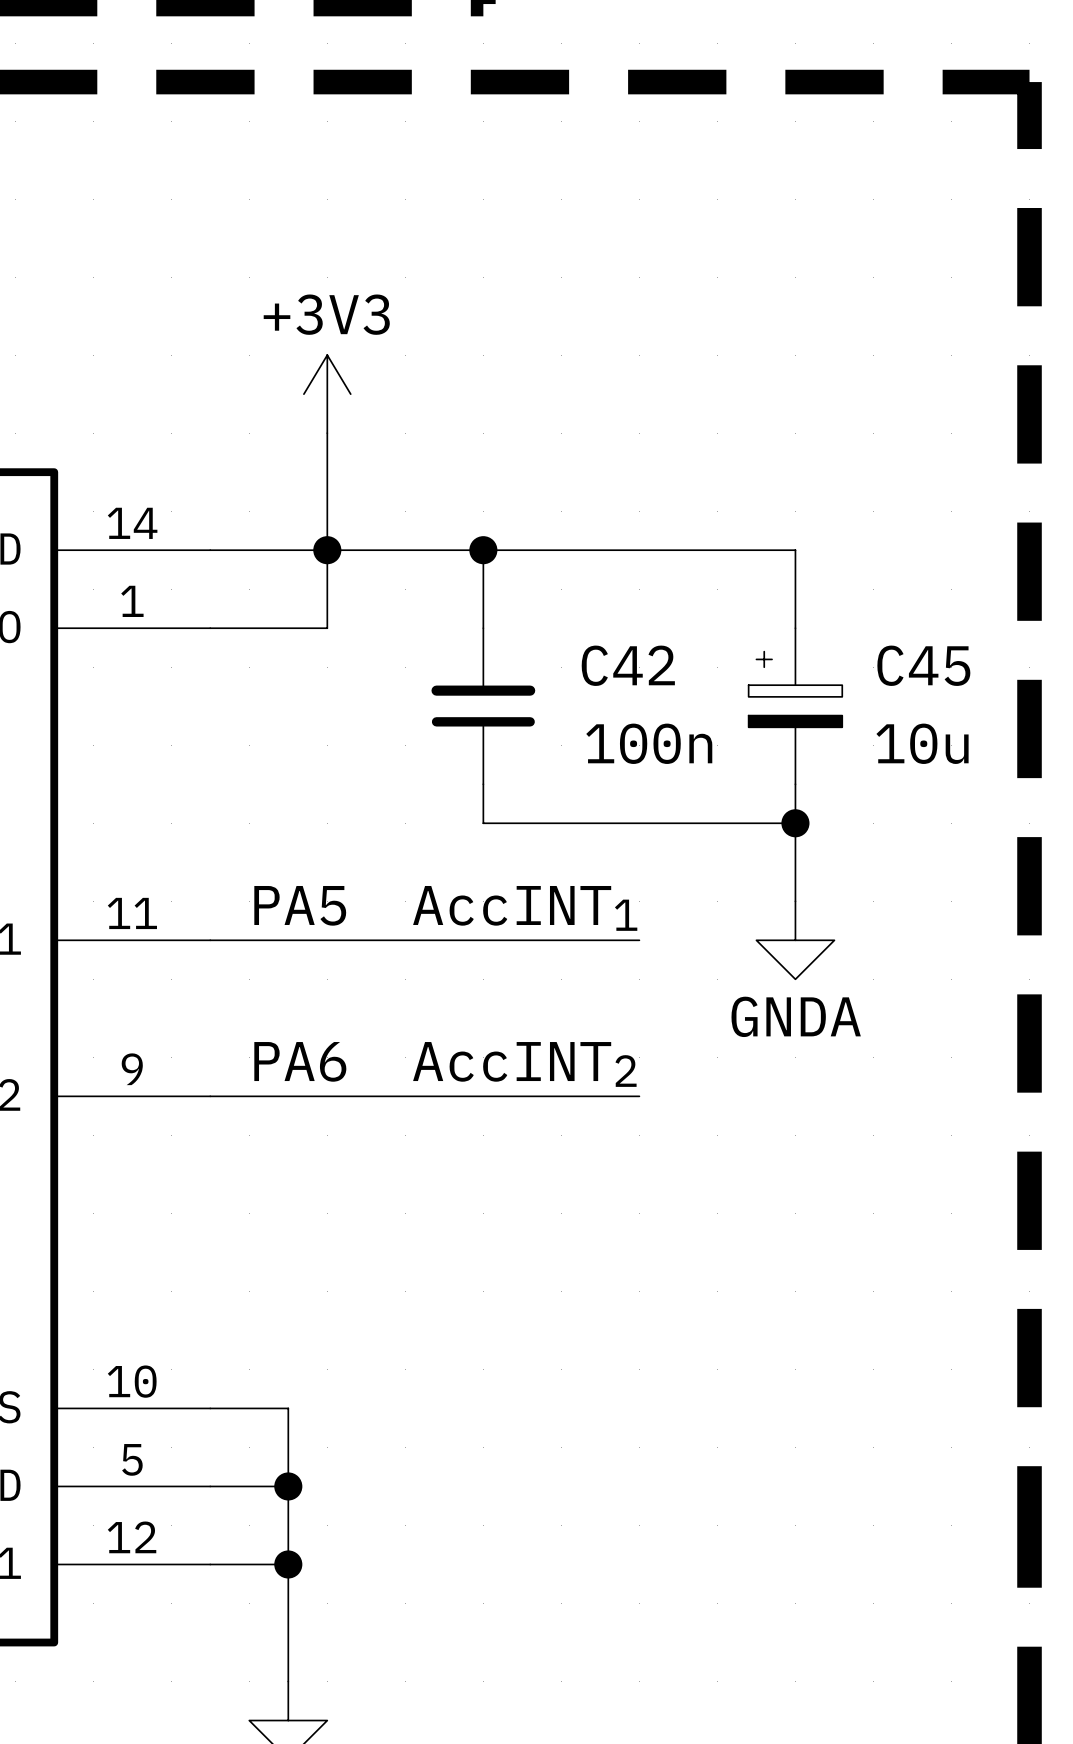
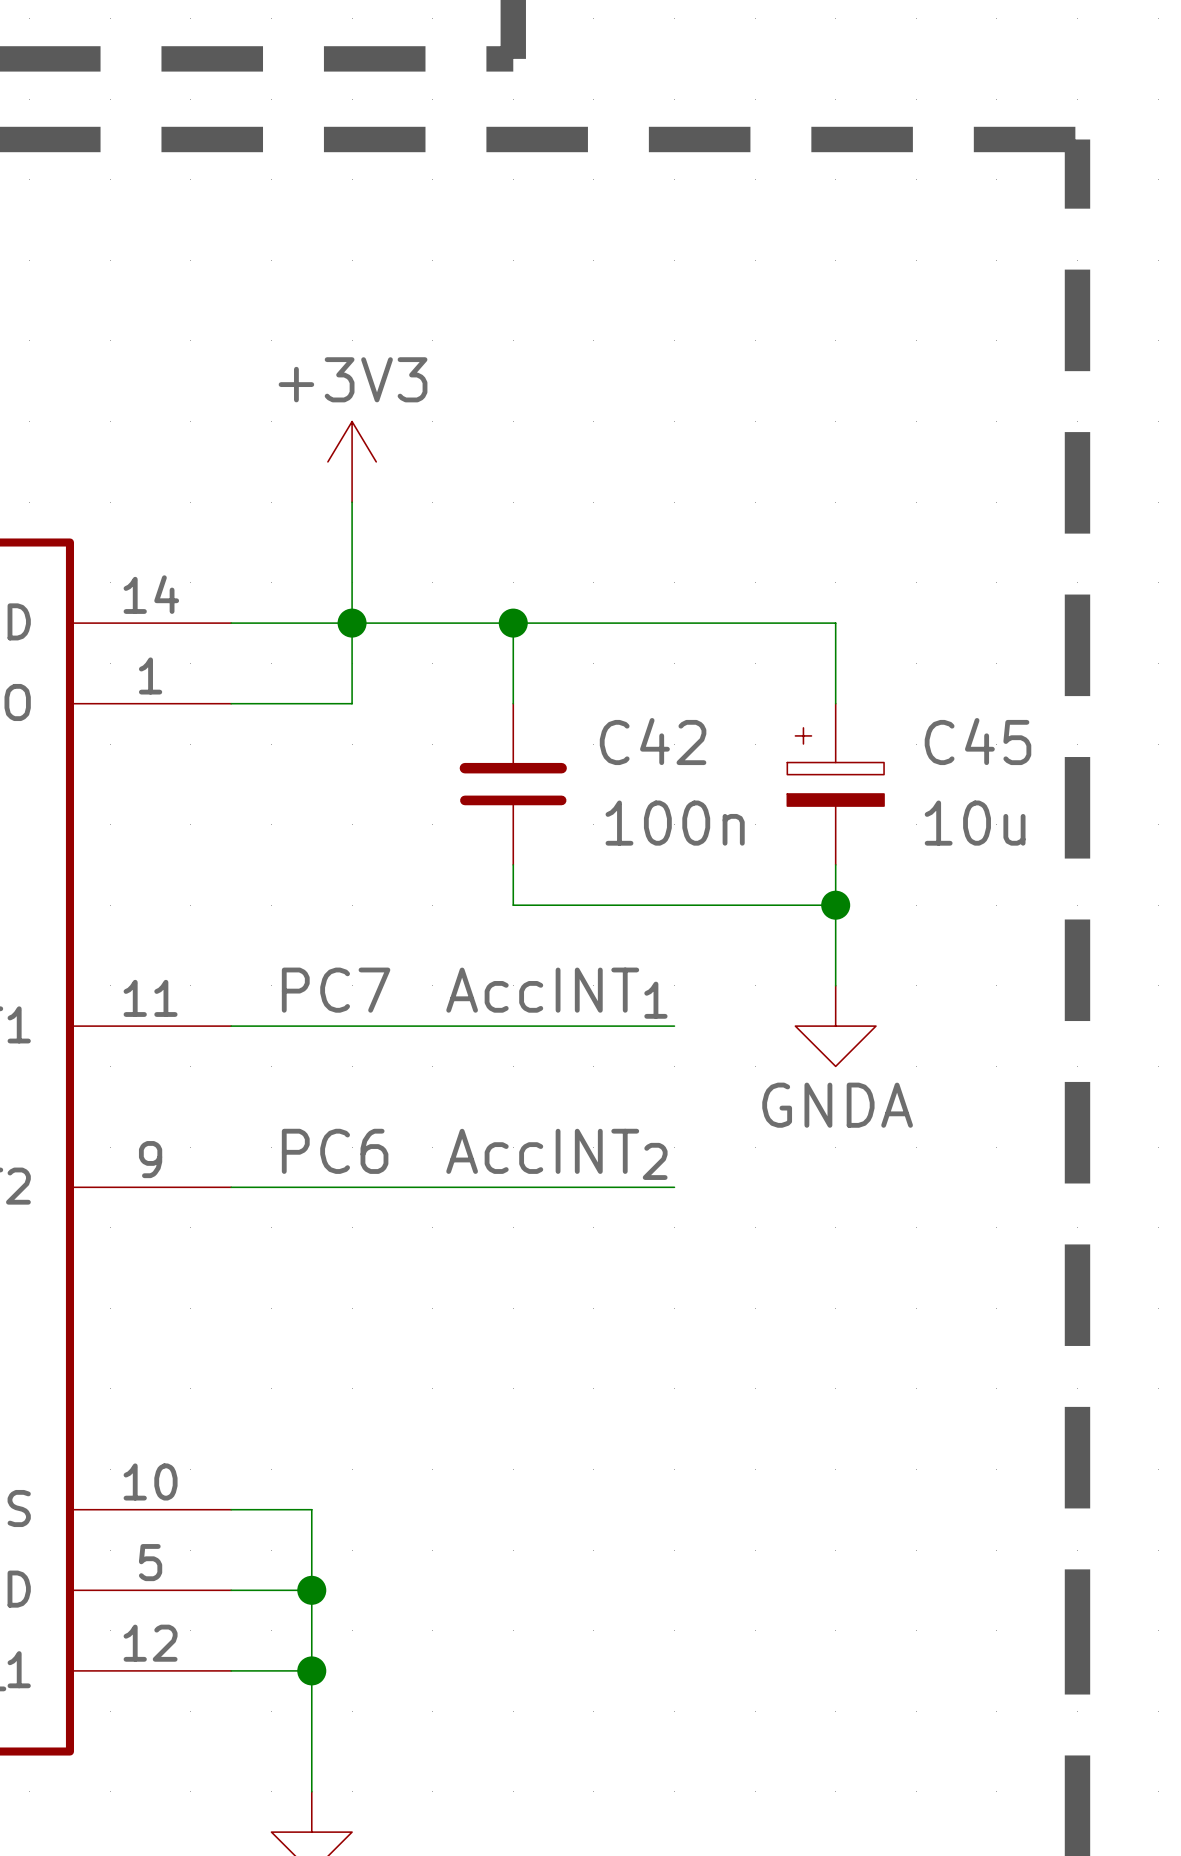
label: PA5 (300, 905) -> PC7 (336, 990)
label: PA6 (300, 1061) -> PC6 (335, 1151)

